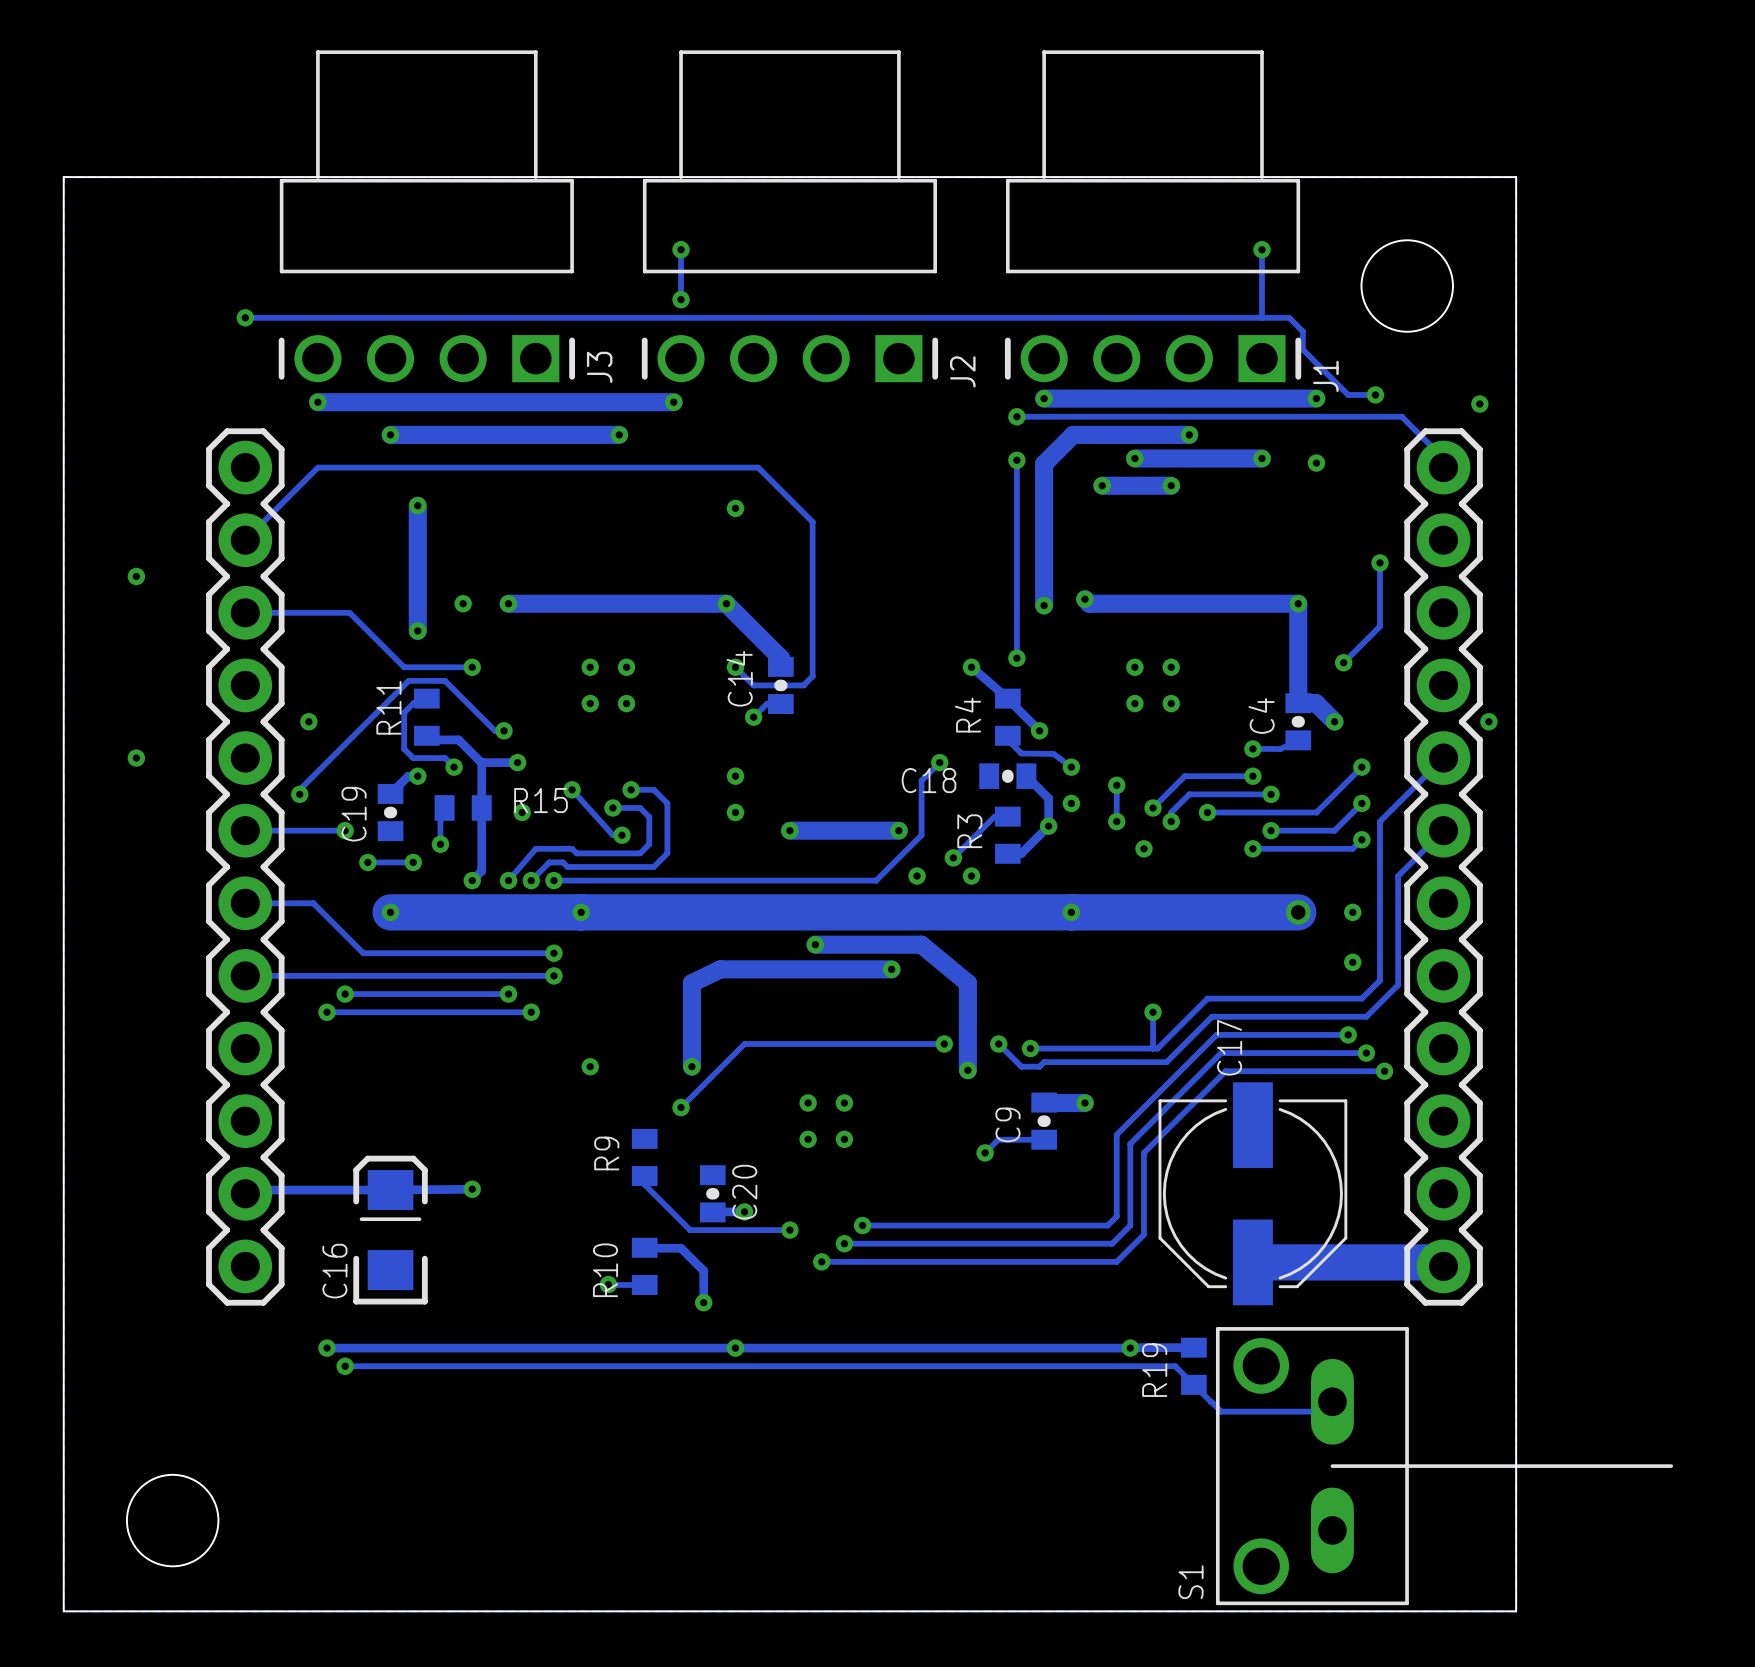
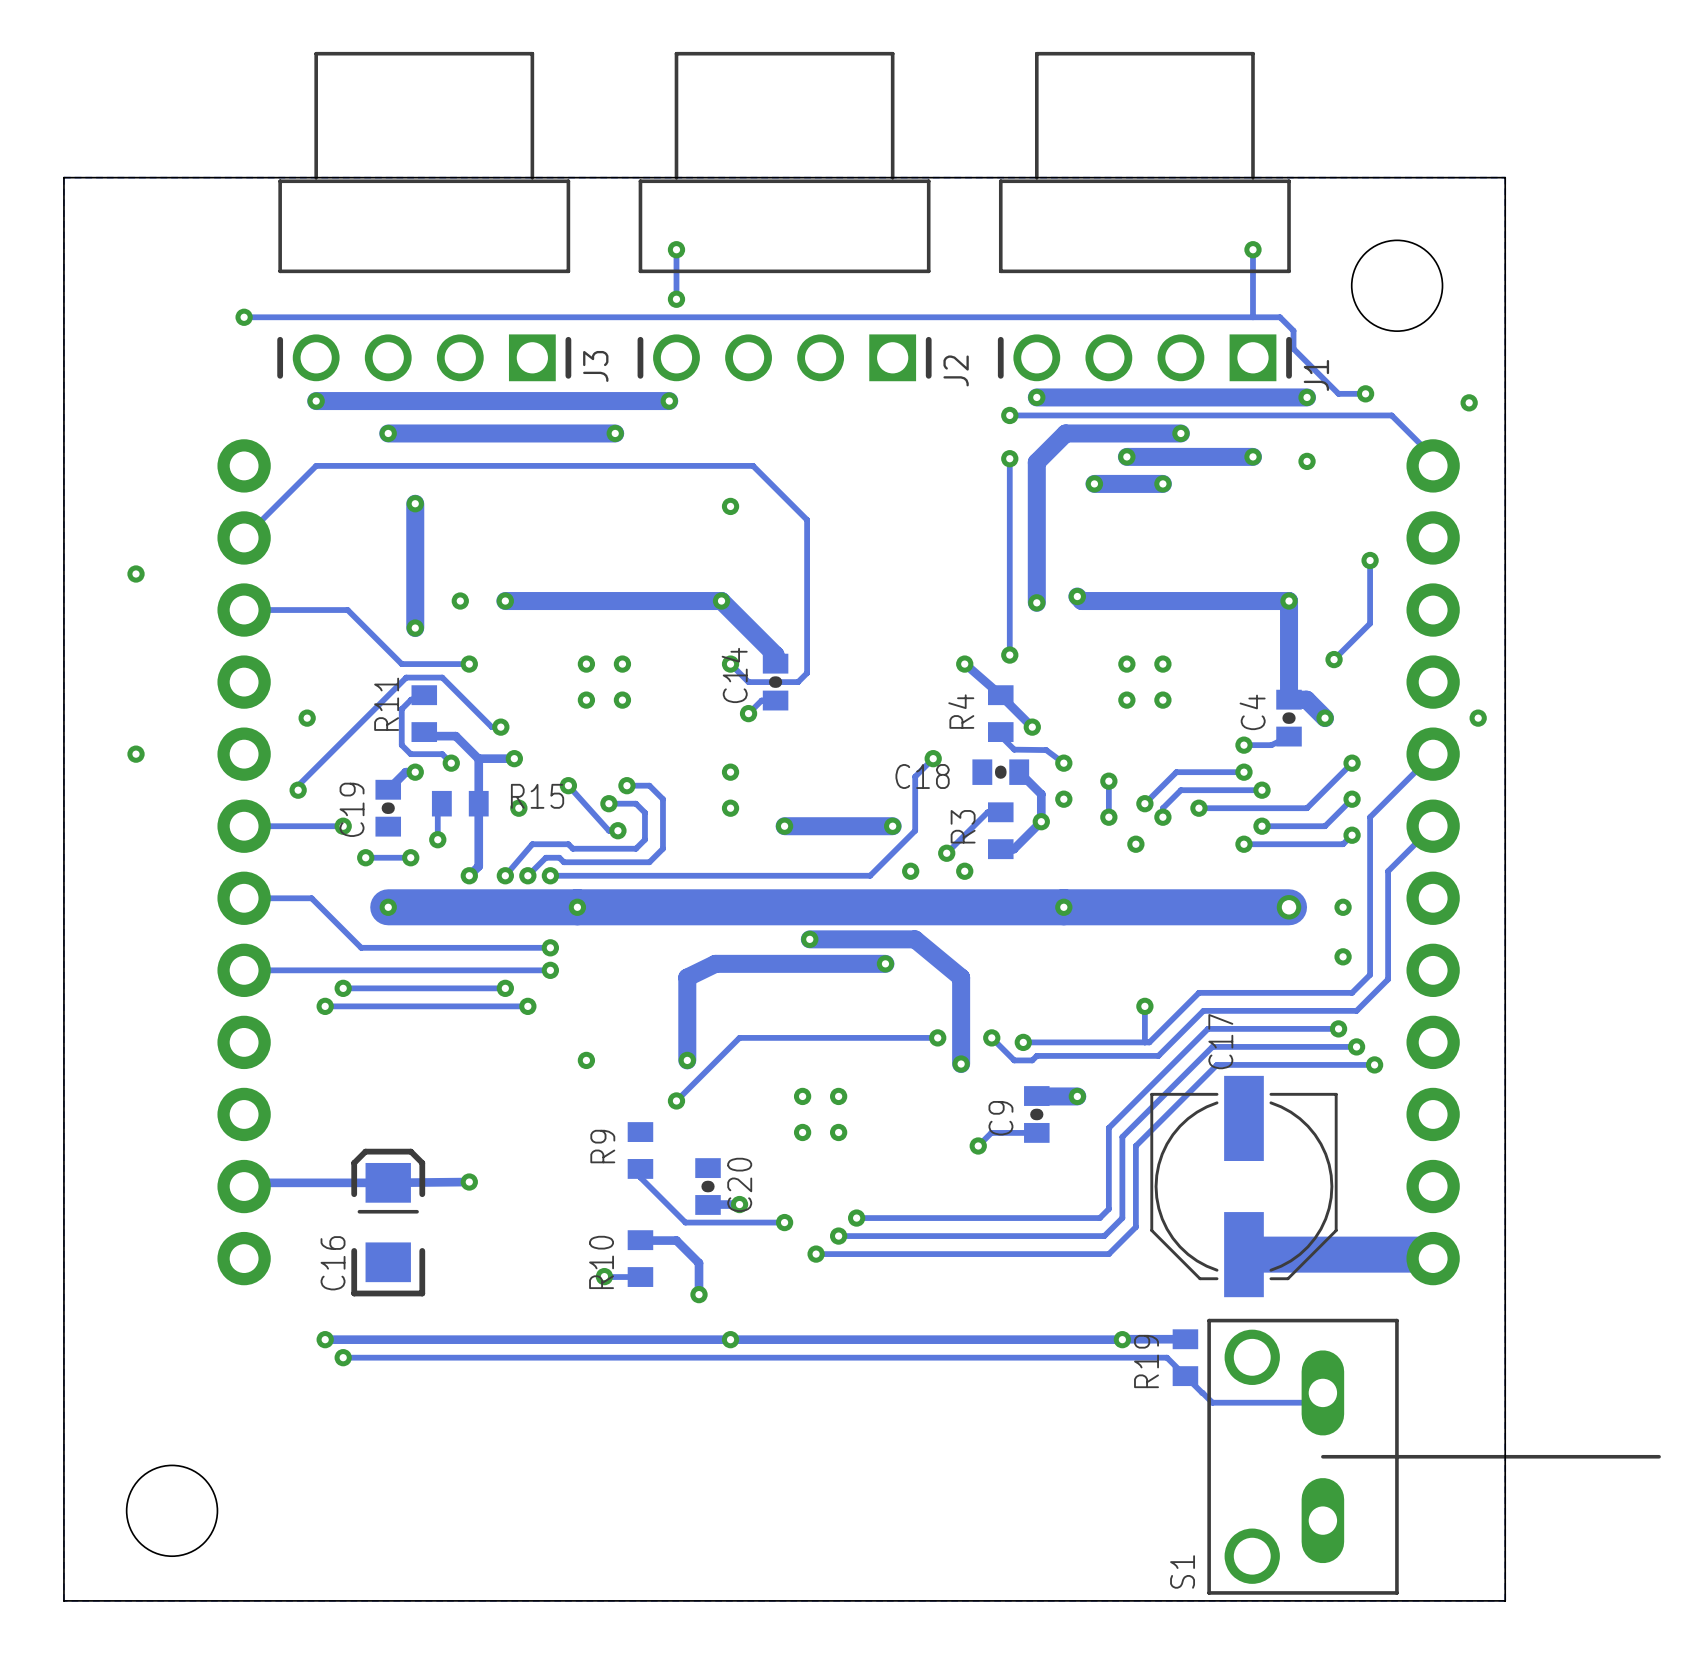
part side: bottom (245, 866) -> top (244, 862)
part side: bottom (1443, 866) -> top (1433, 862)

